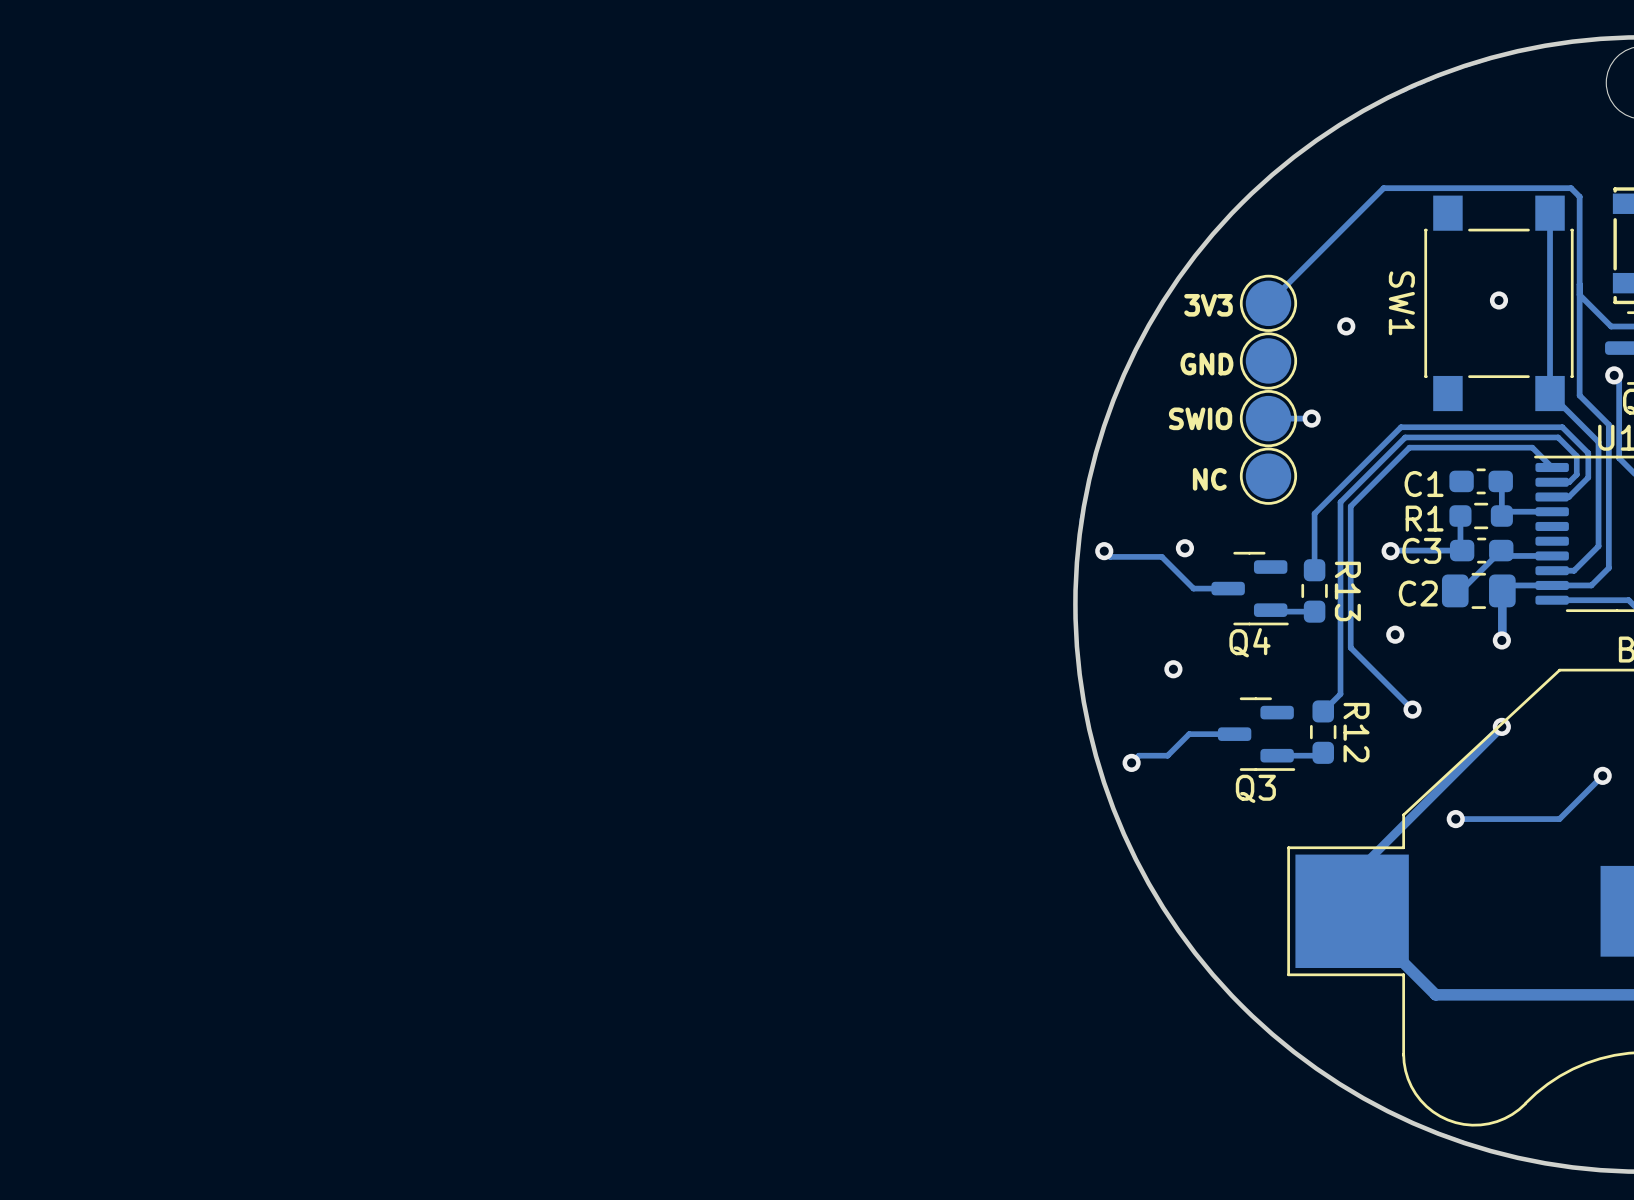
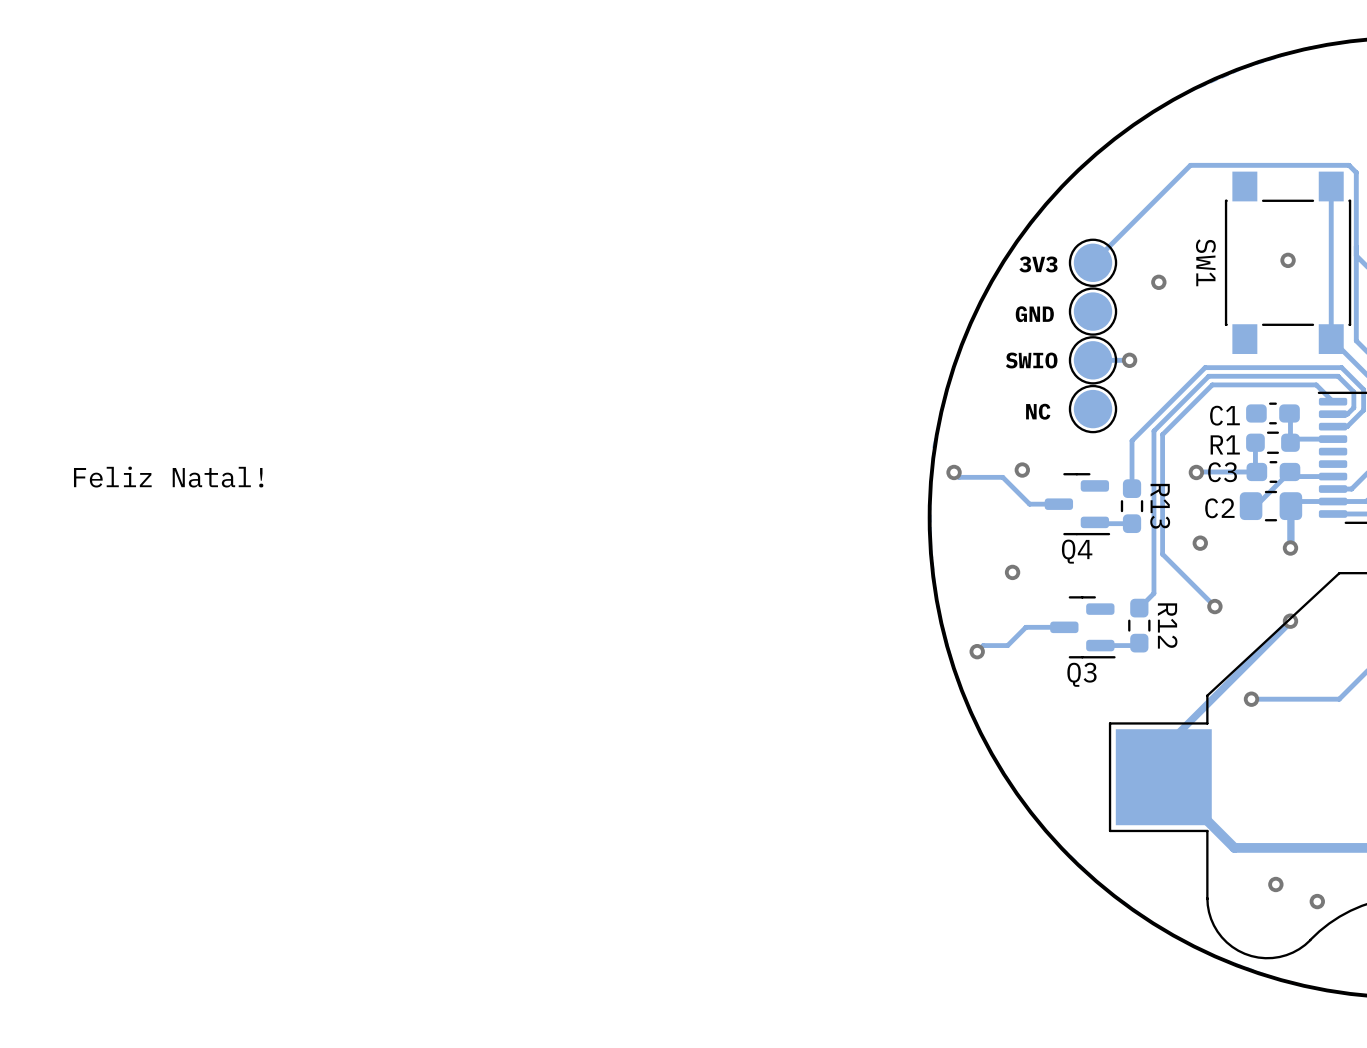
text: none -> Feliz Natal! (168, 477)
via: none -> (1275, 884)
via: none -> (1317, 901)

